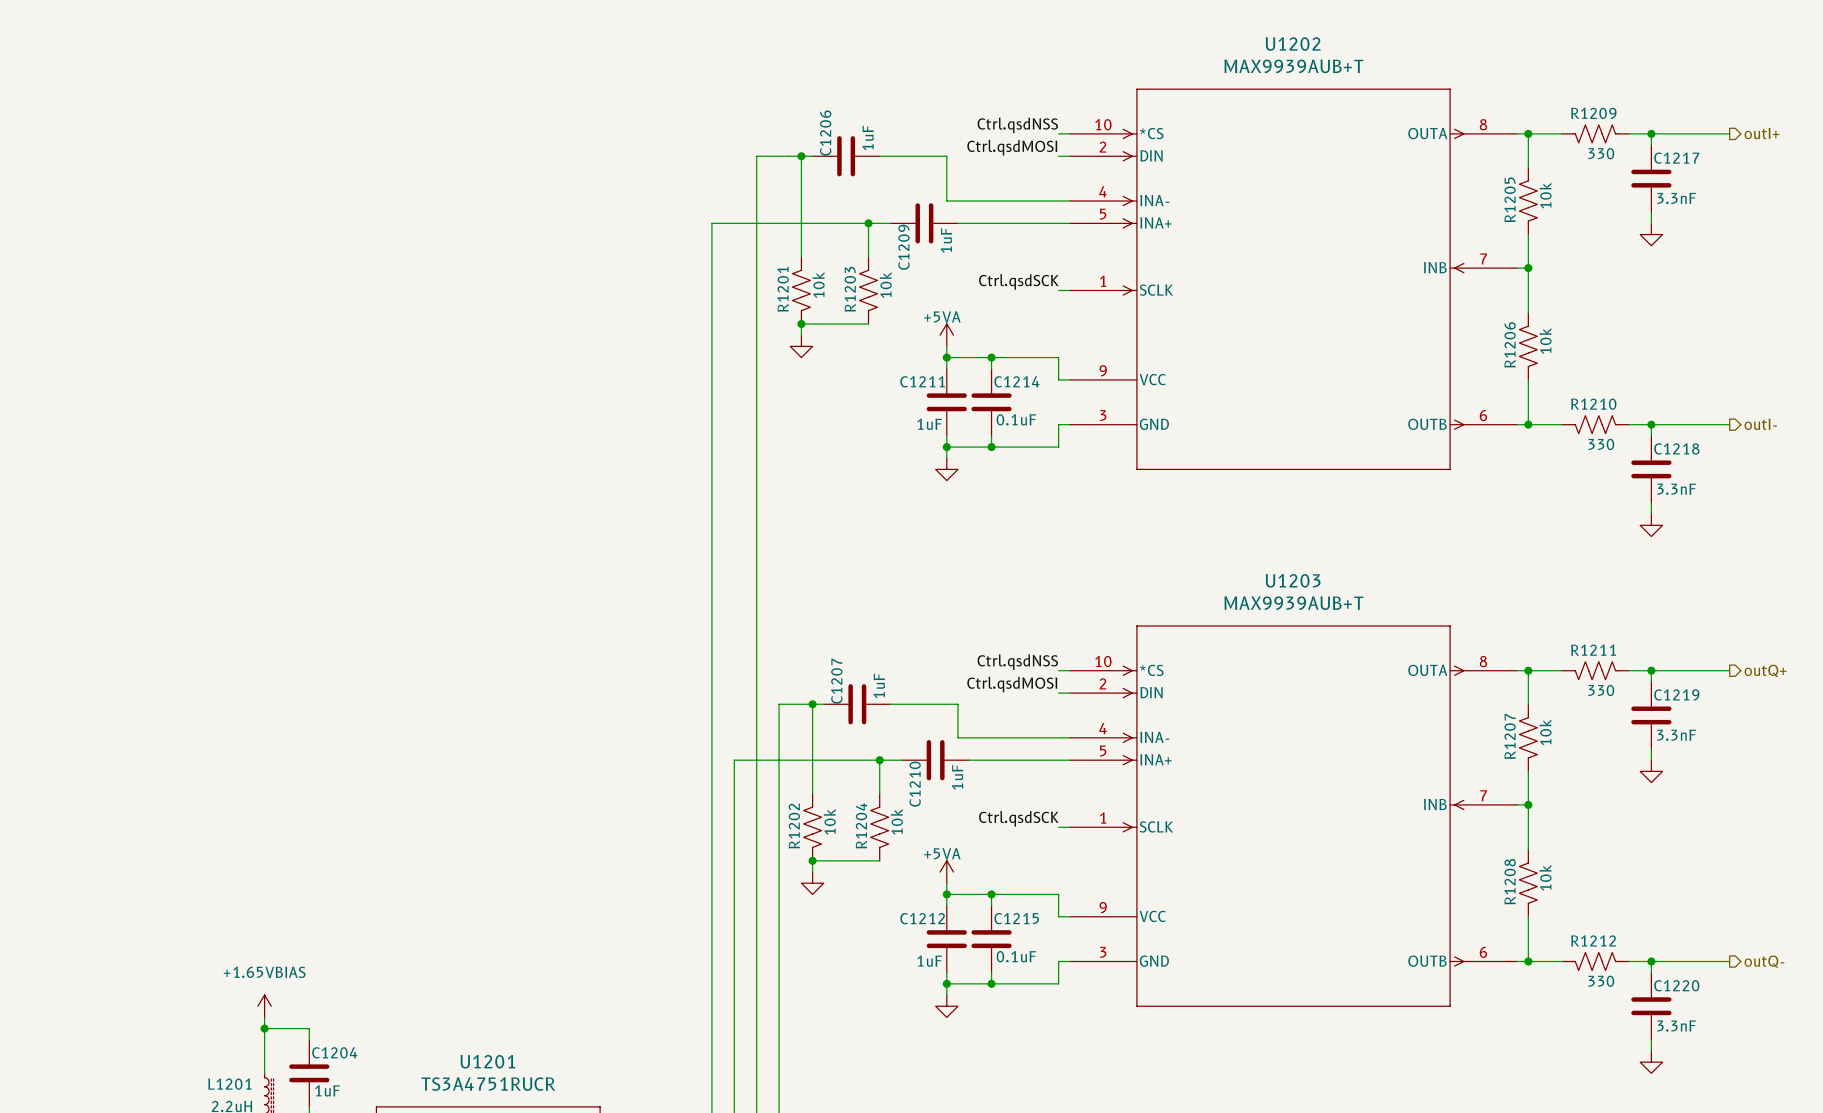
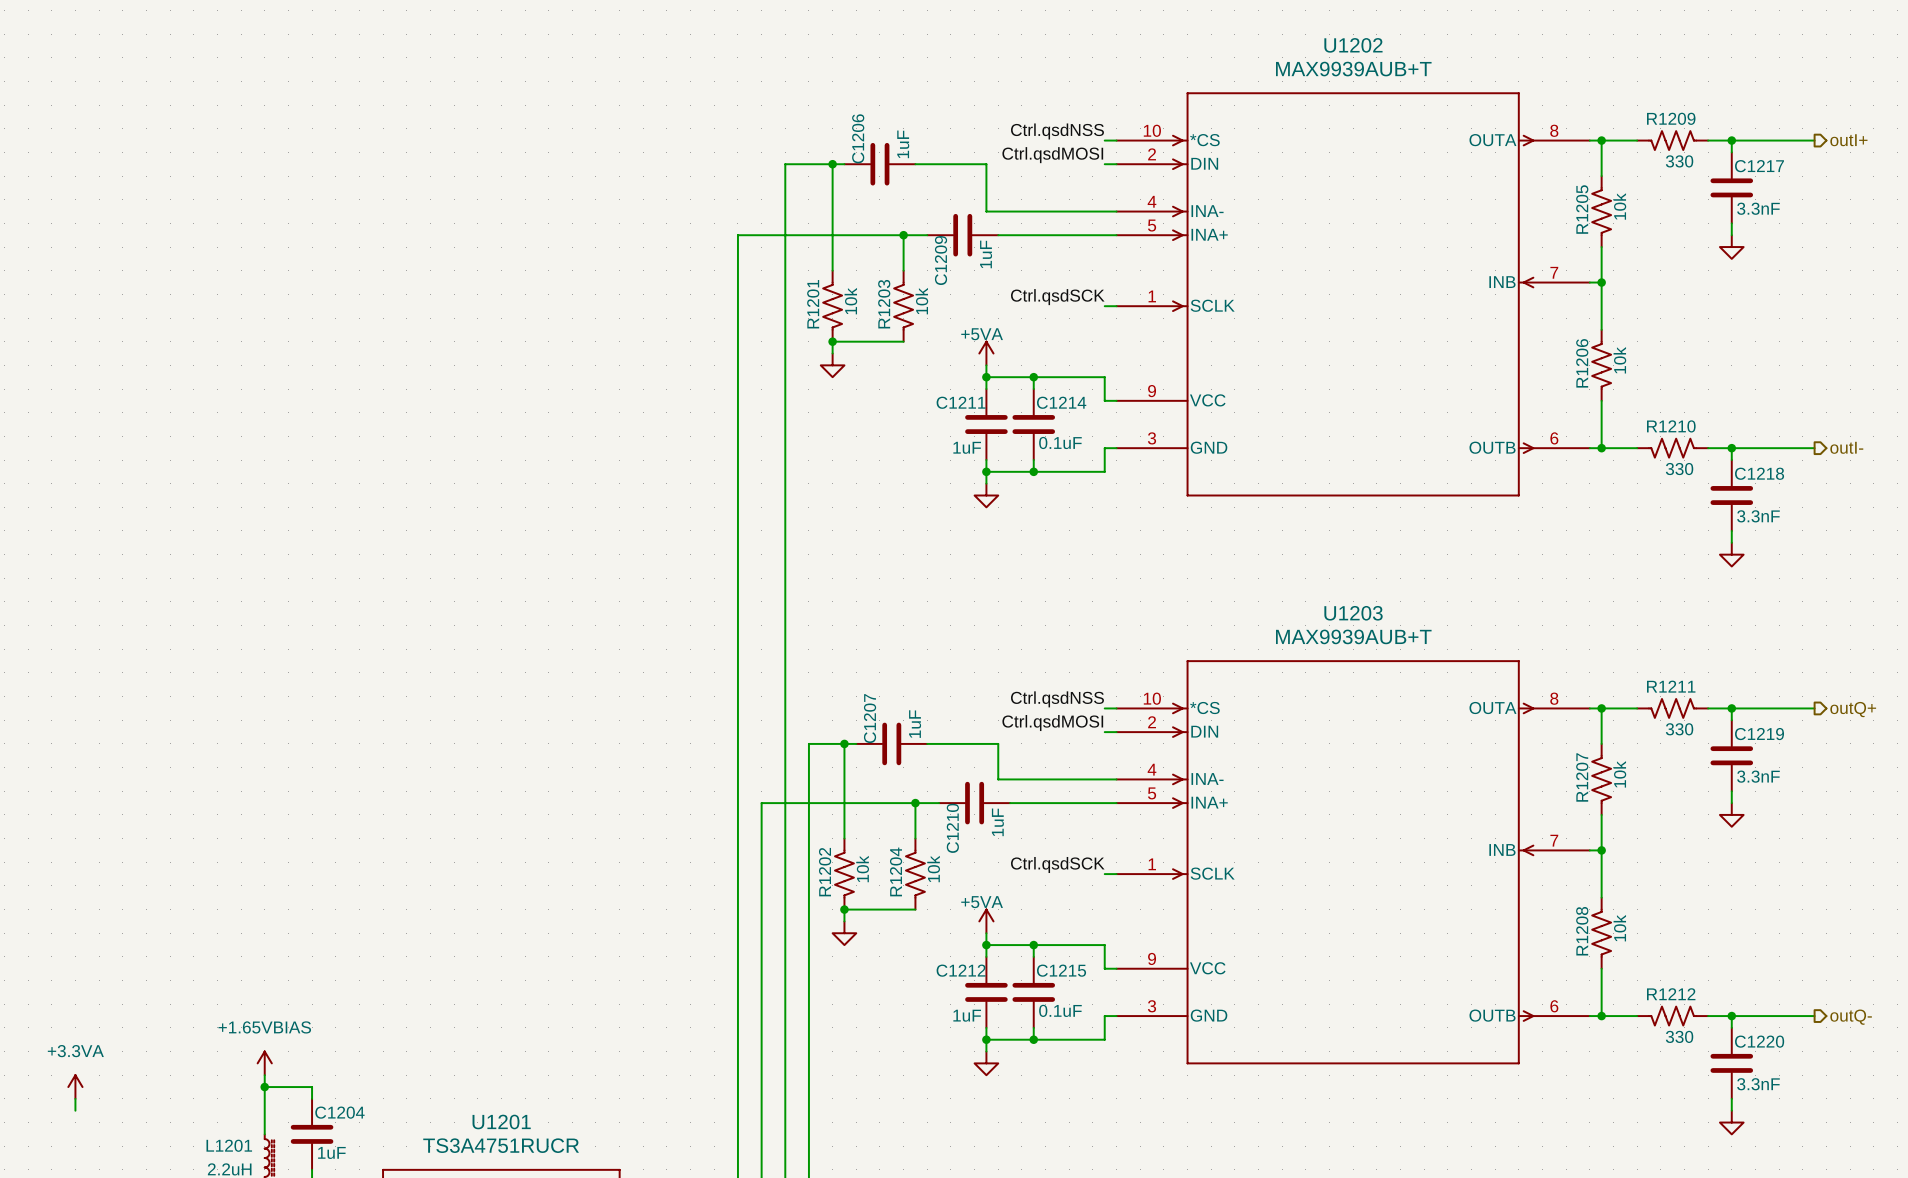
power symbol: none -> +3.3VA (75, 1087)
wire: none -> (75, 1098) (75, 1110)

